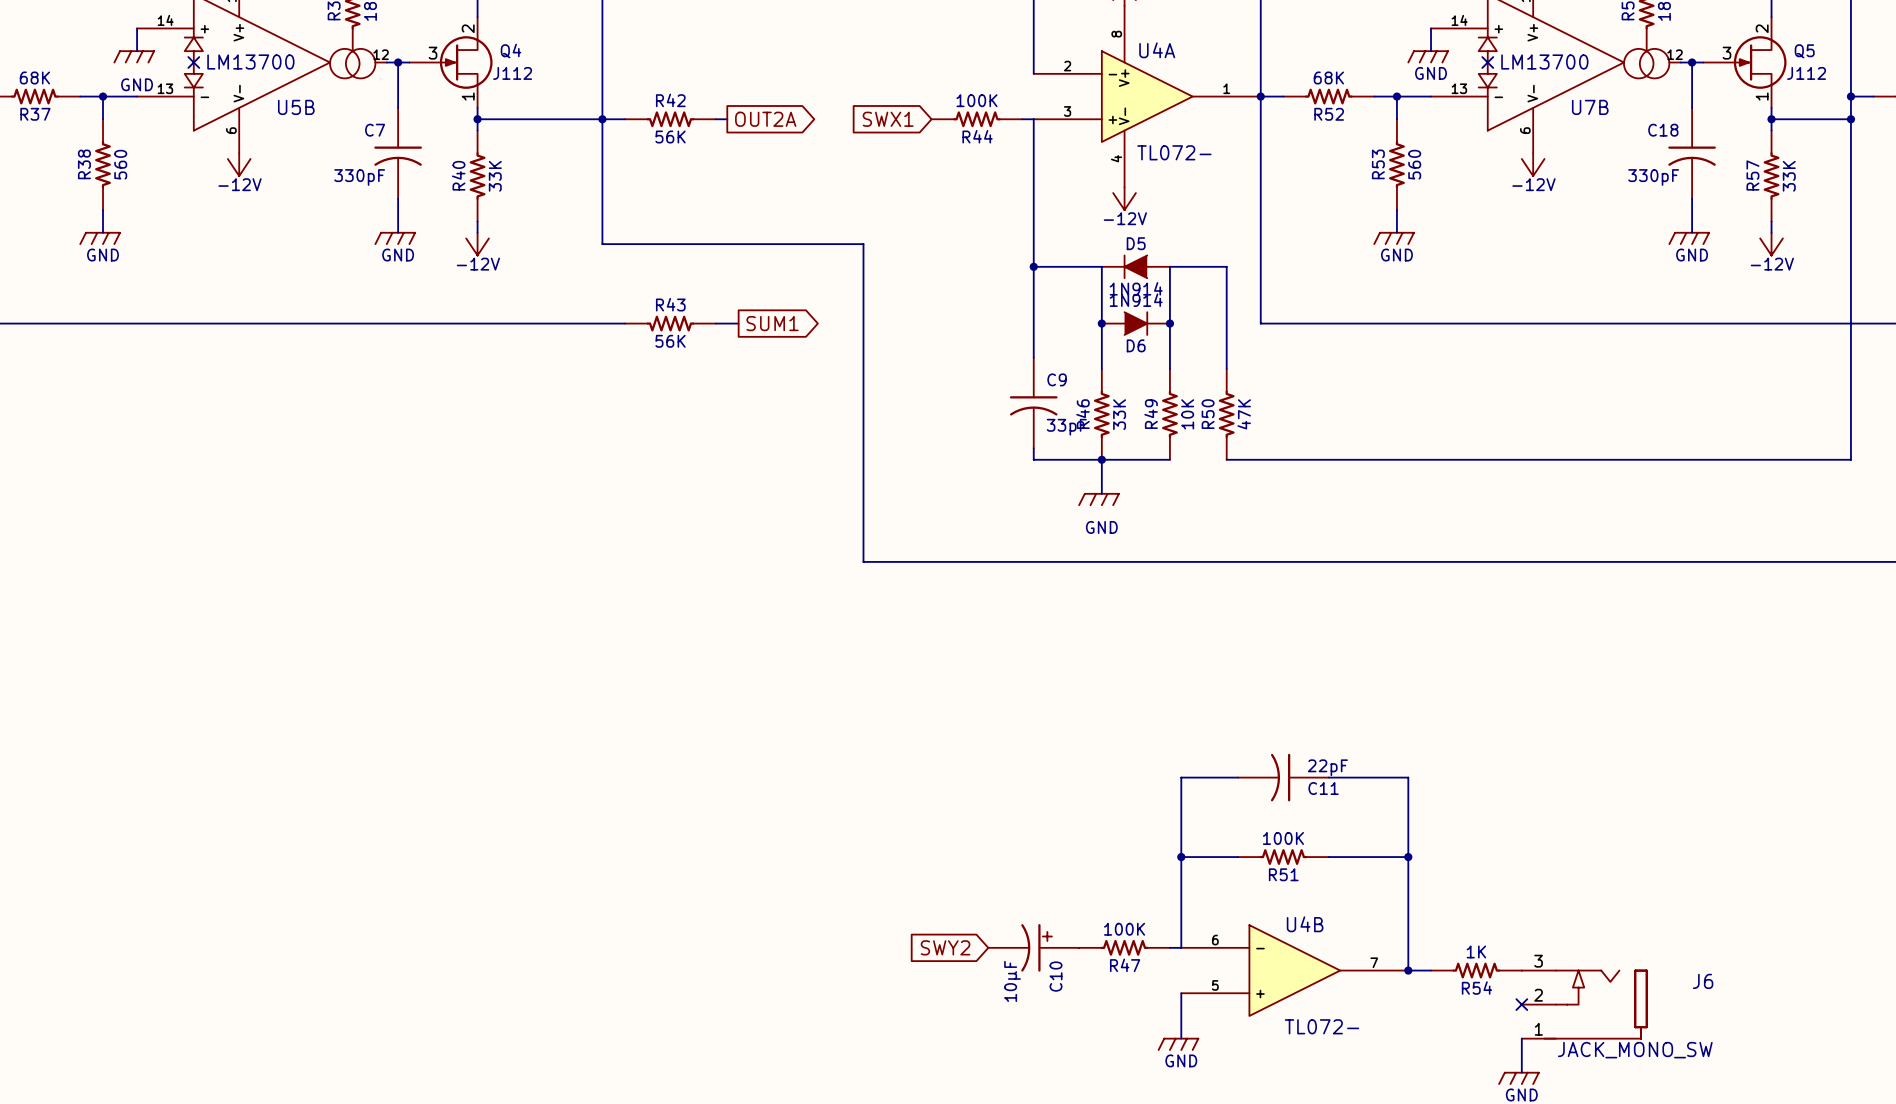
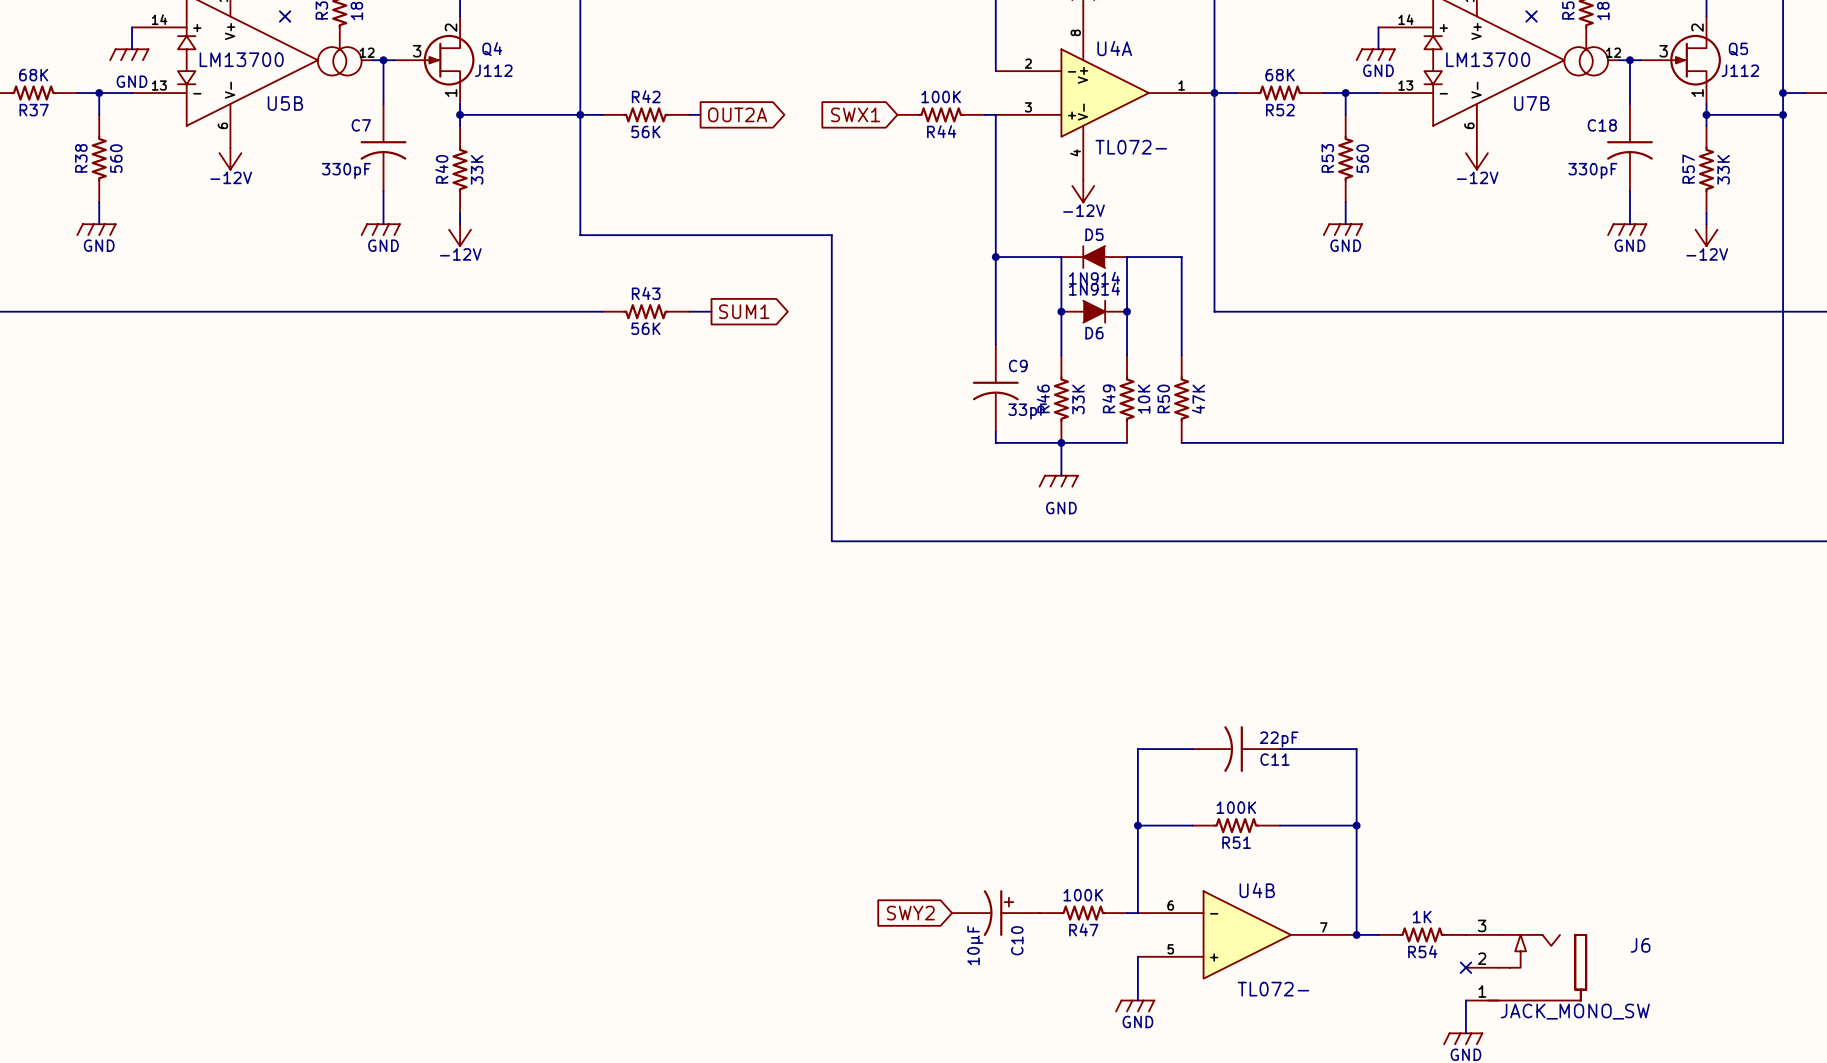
no-connect mark: none -> (285, 16)
no-connect mark: none -> (1531, 16)
no-connect mark: (193, 62) -> none
no-connect mark: (1487, 62) -> none

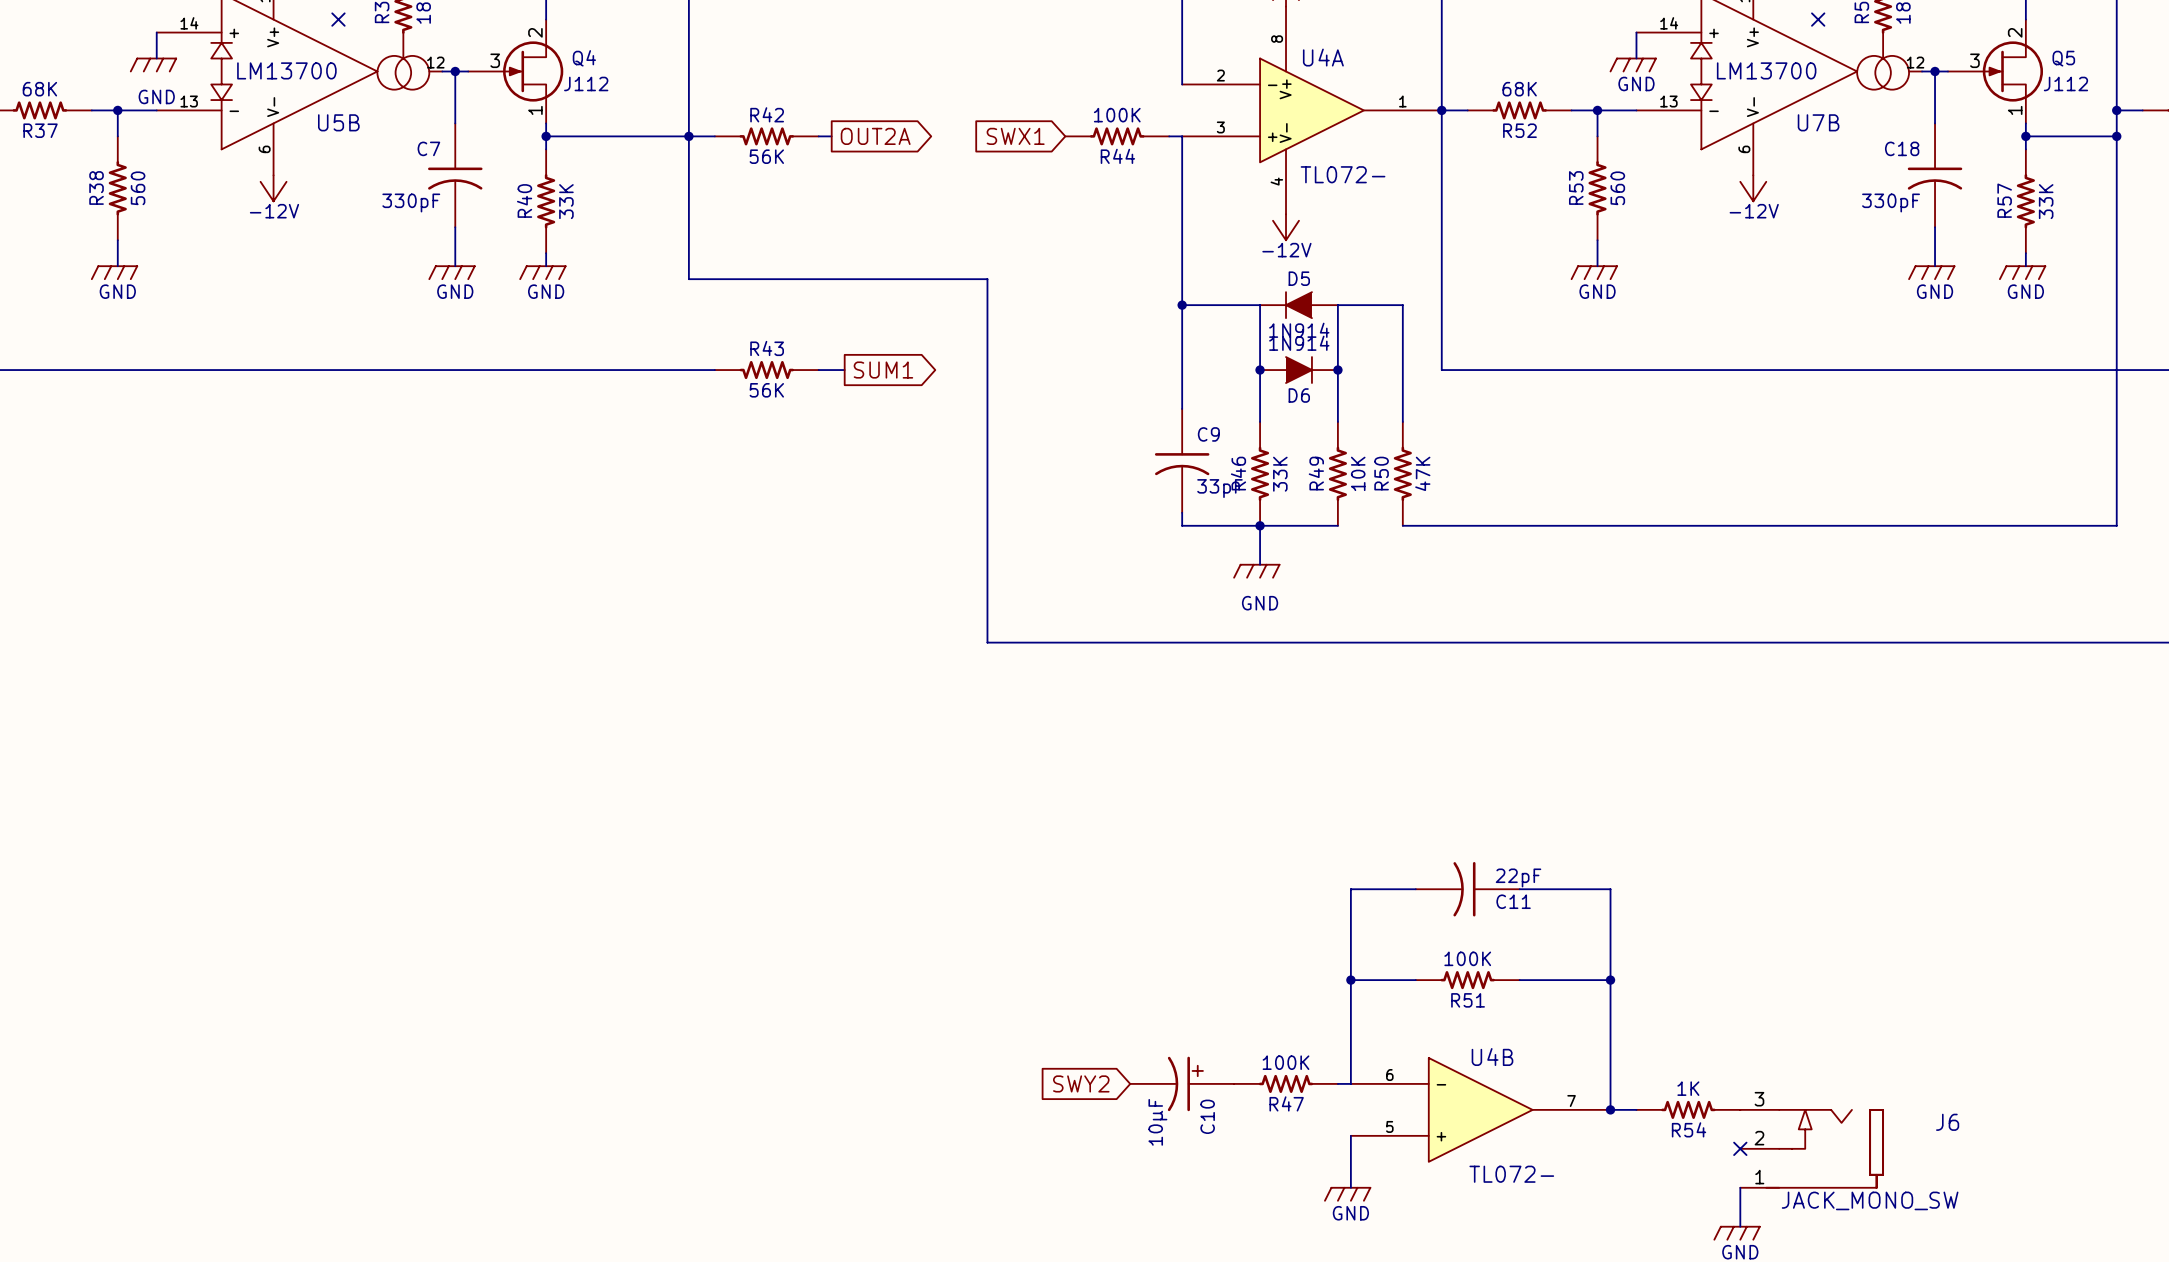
power symbol: -12V (460, 235) -> GND (542, 272)
power symbol: -12V (1706, 235) -> GND (2022, 272)

